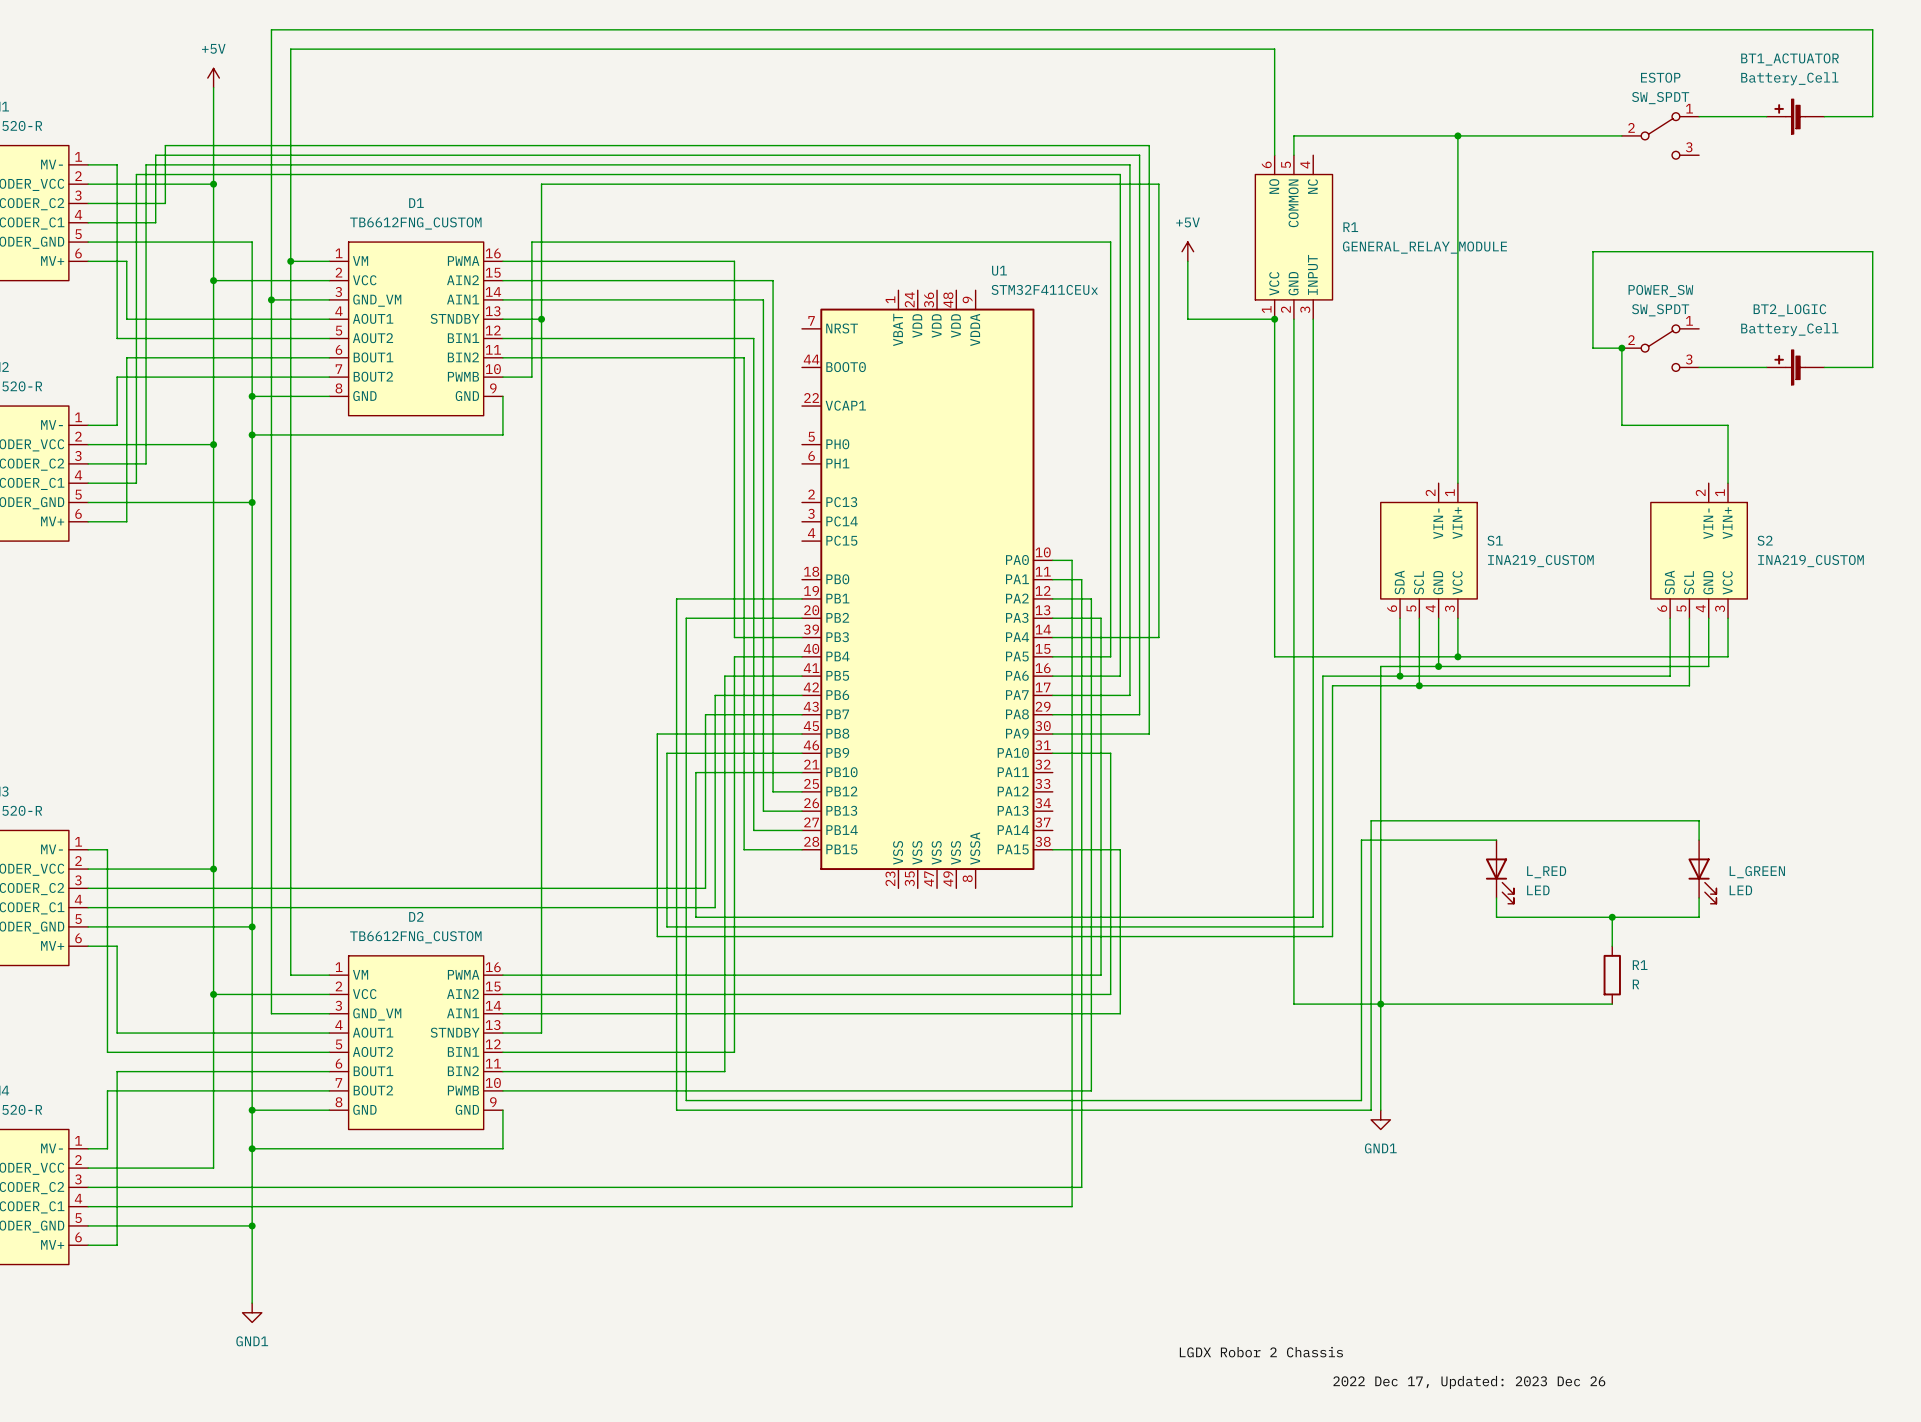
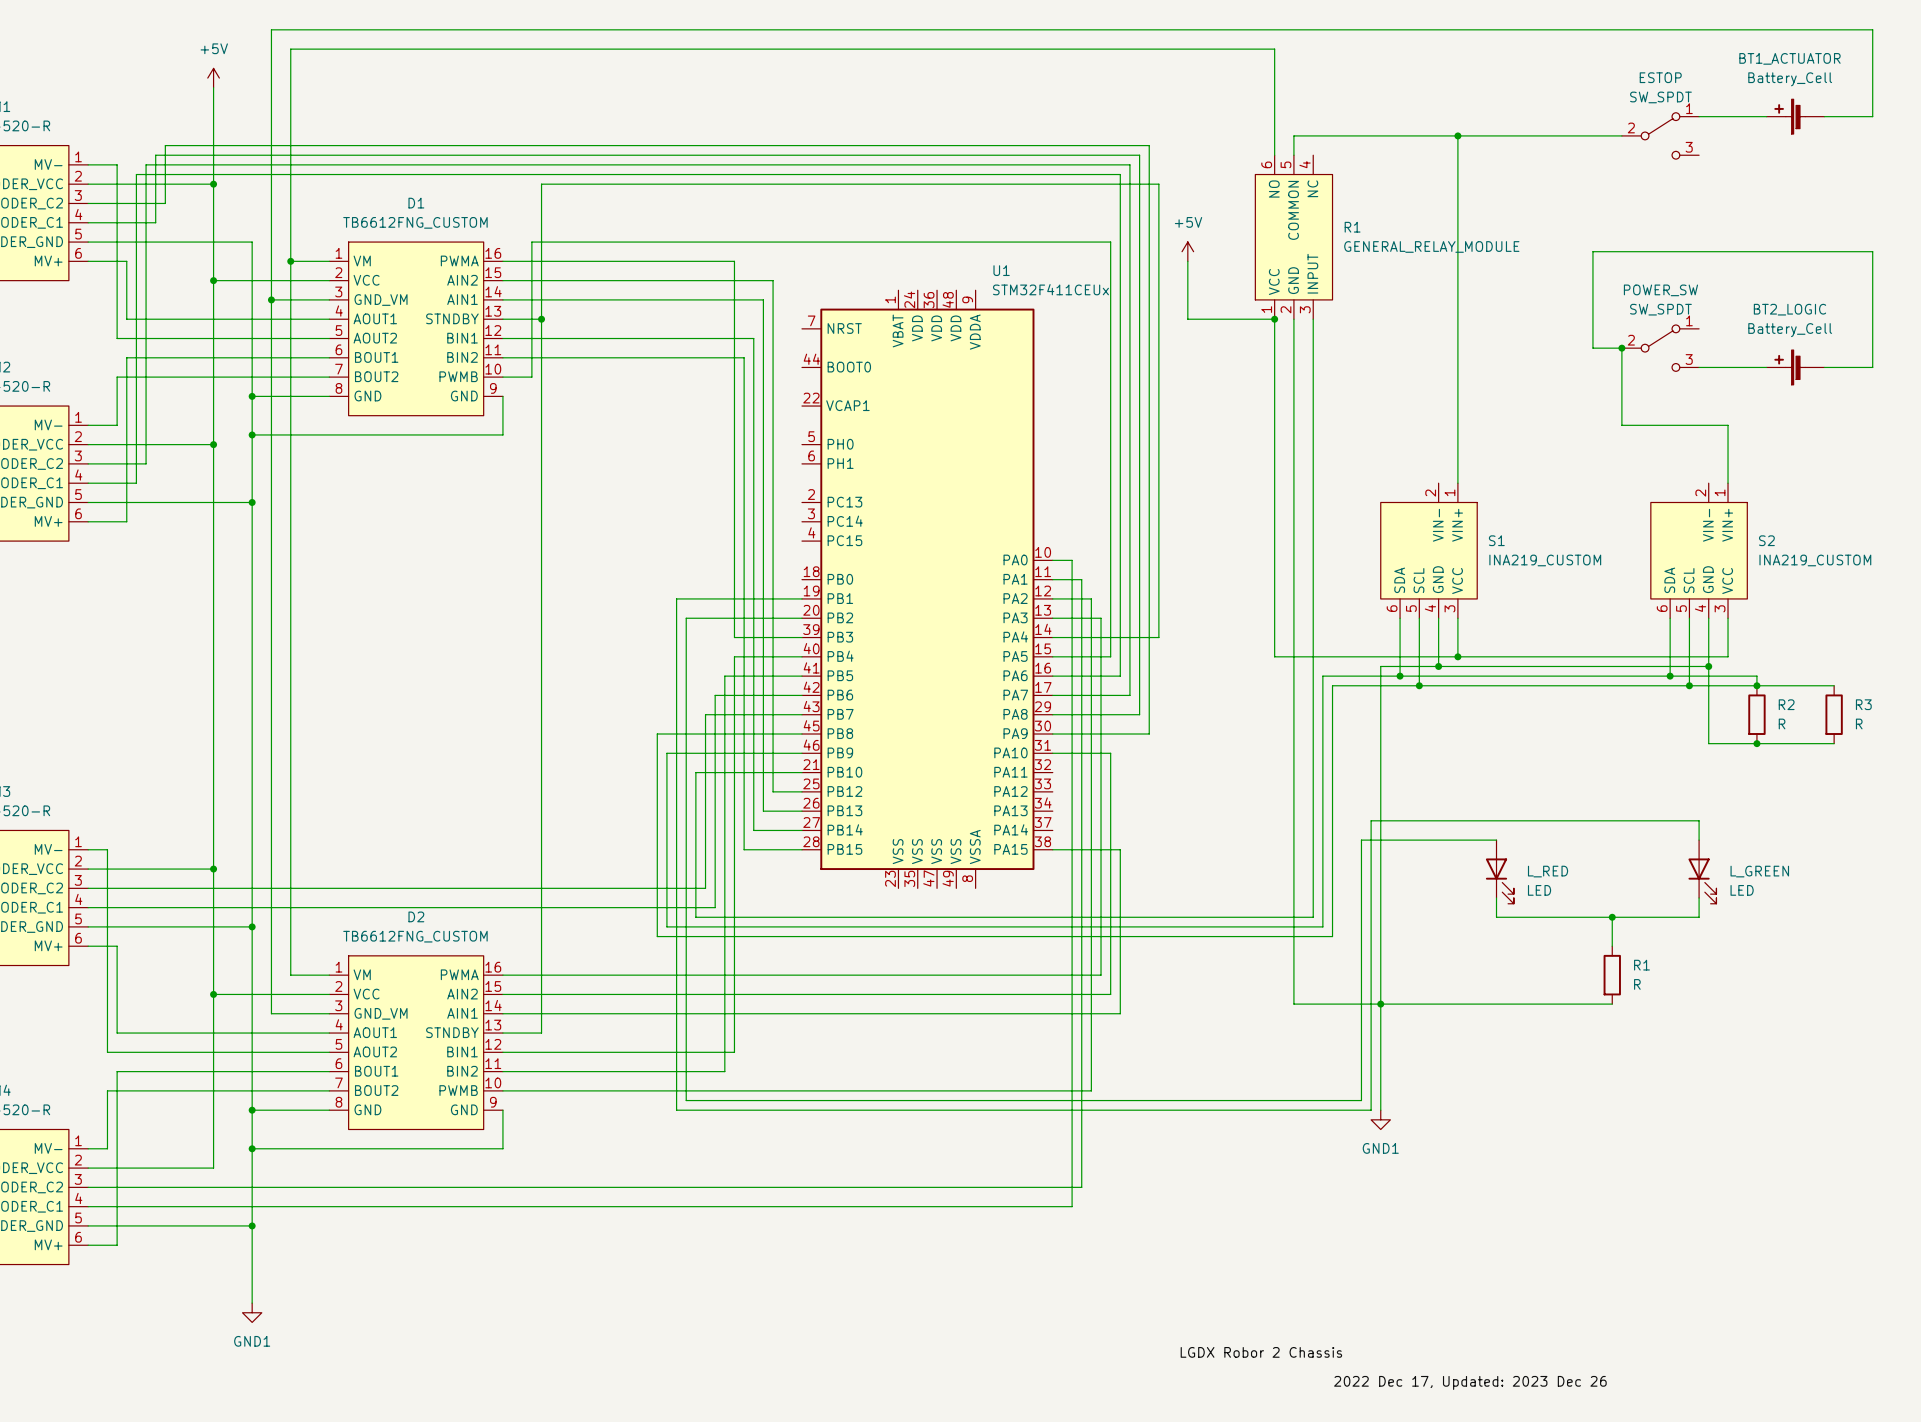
wire: none -> (1708, 666) (1708, 743) (1834, 743)
junction: none -> (1708, 666)
wire: none -> (1670, 676) (1756, 676) (1756, 685)
junction: none -> (1670, 676)
wire: none -> (1689, 685) (1834, 685)
junction: none -> (1689, 685)
junction: none -> (1756, 685)
R2: none -> R (1756, 714)
R3: none -> R (1834, 714)
junction: none -> (1756, 743)

